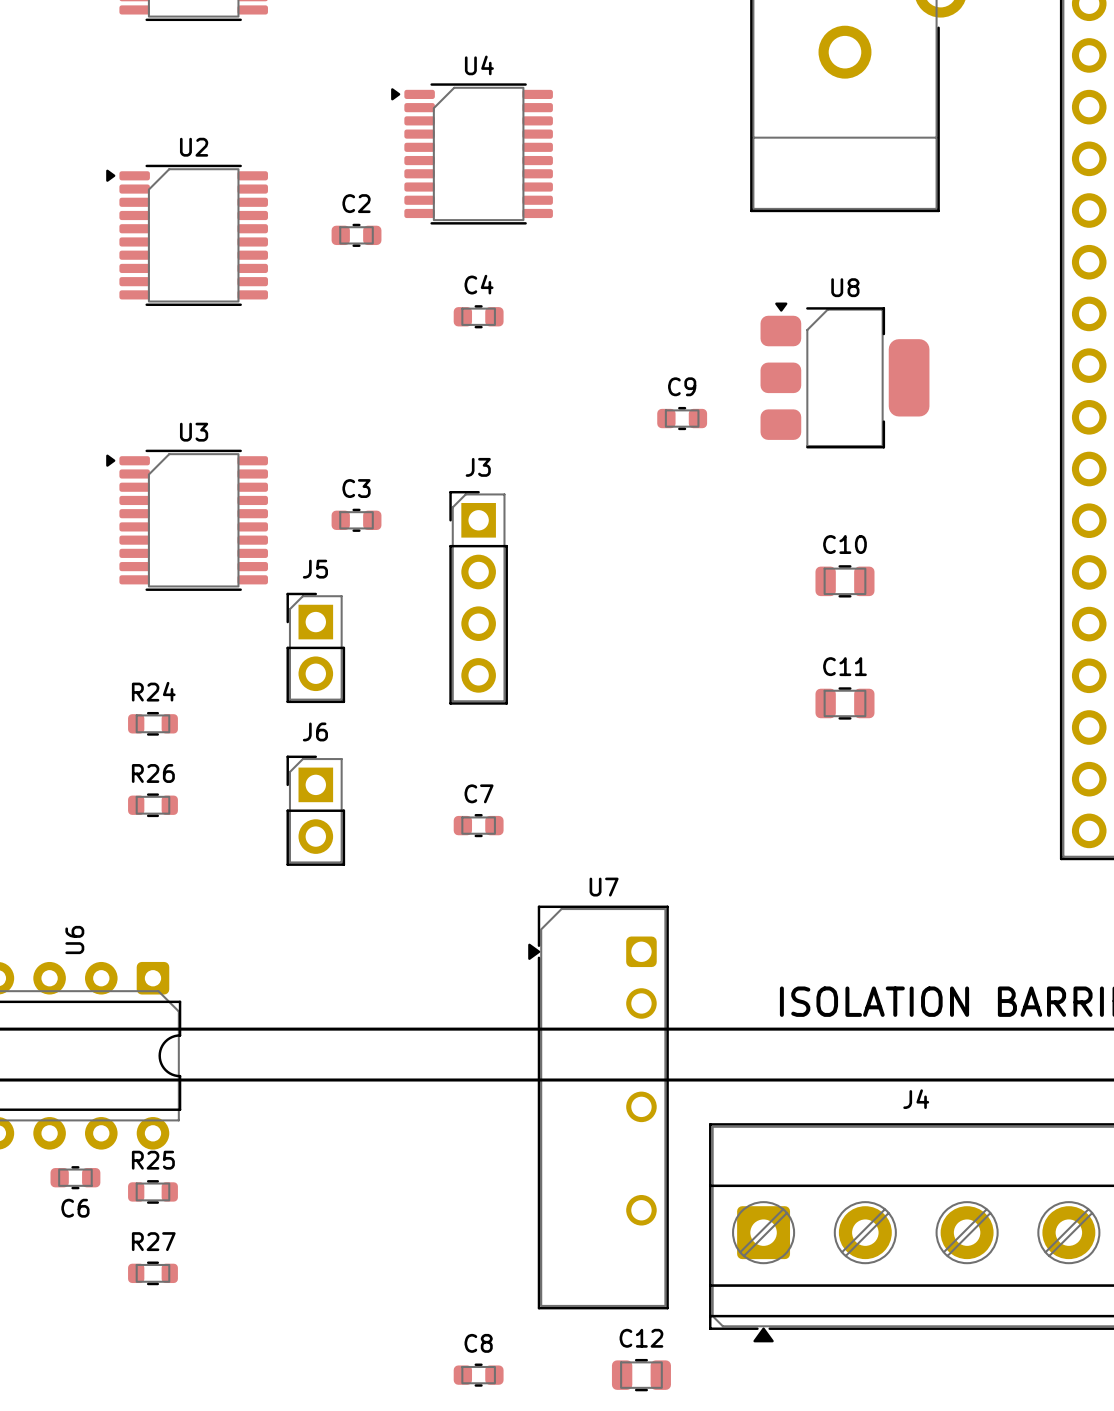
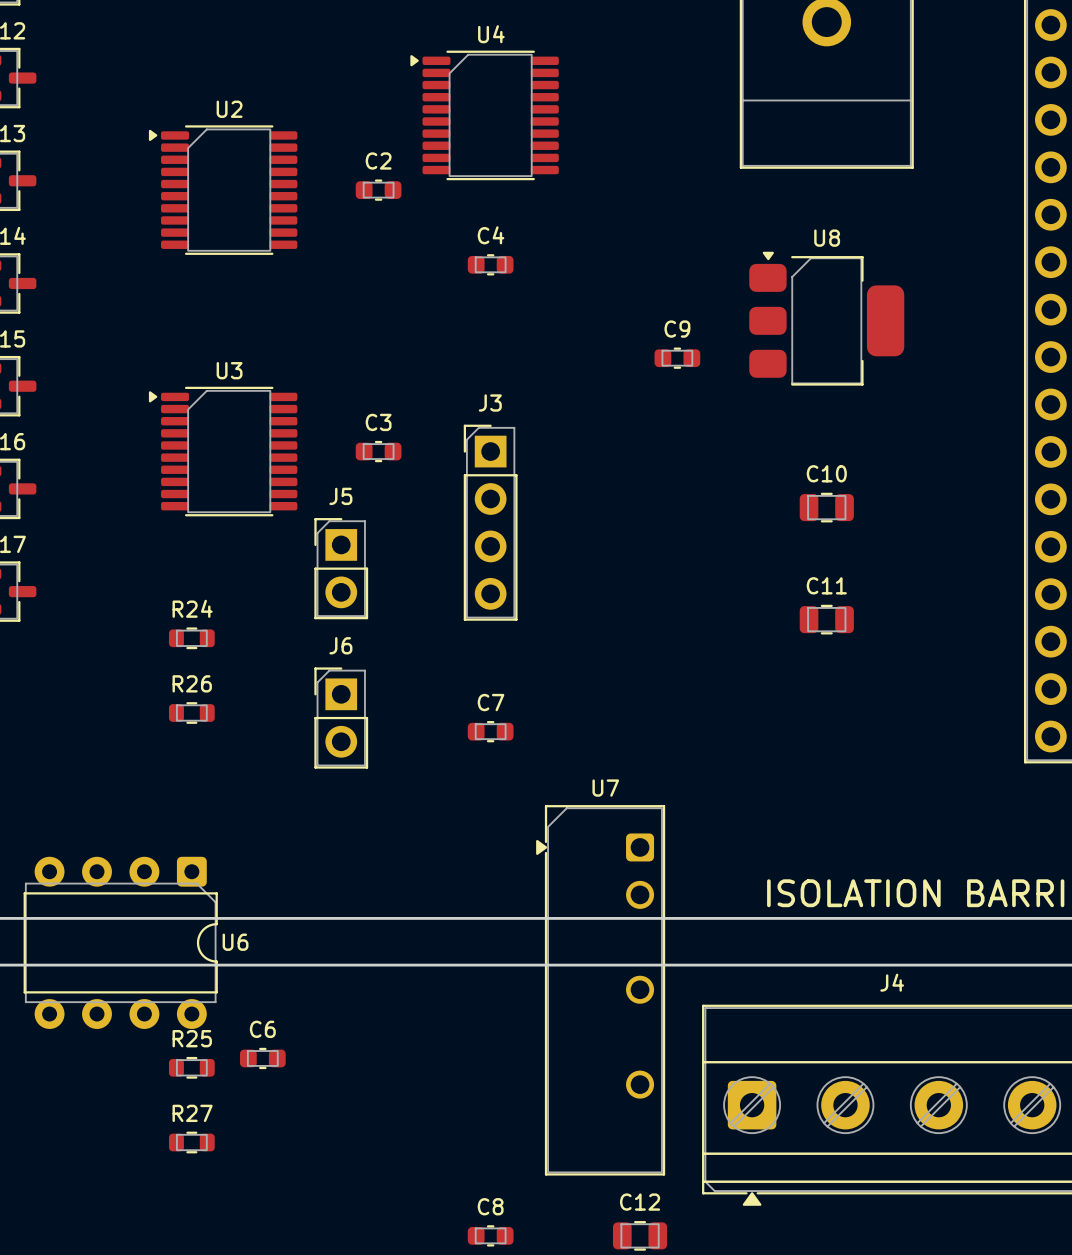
U6 name rotation: 0° (74, 939) -> 90° clockwise (235, 942)
U6 name position: U6 (74, 939) -> U6 (235, 942)
C6 position: (75, 1177) -> (262, 1058)
C6 name position: C6 (75, 1208) -> C6 (262, 1029)

